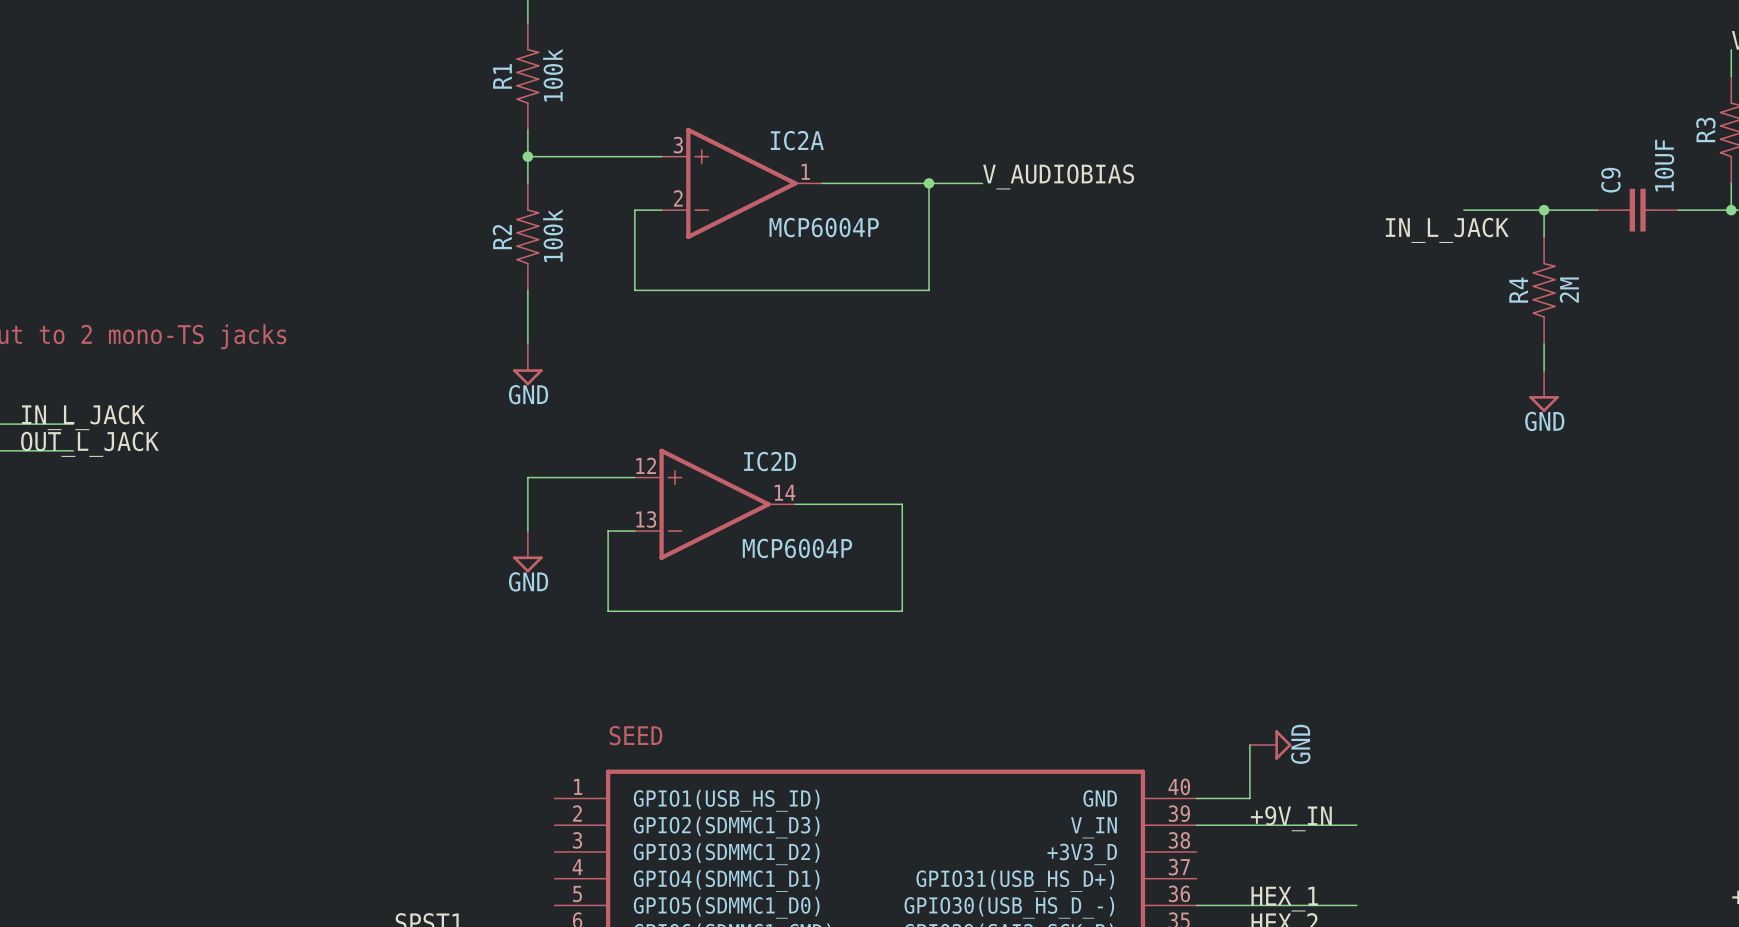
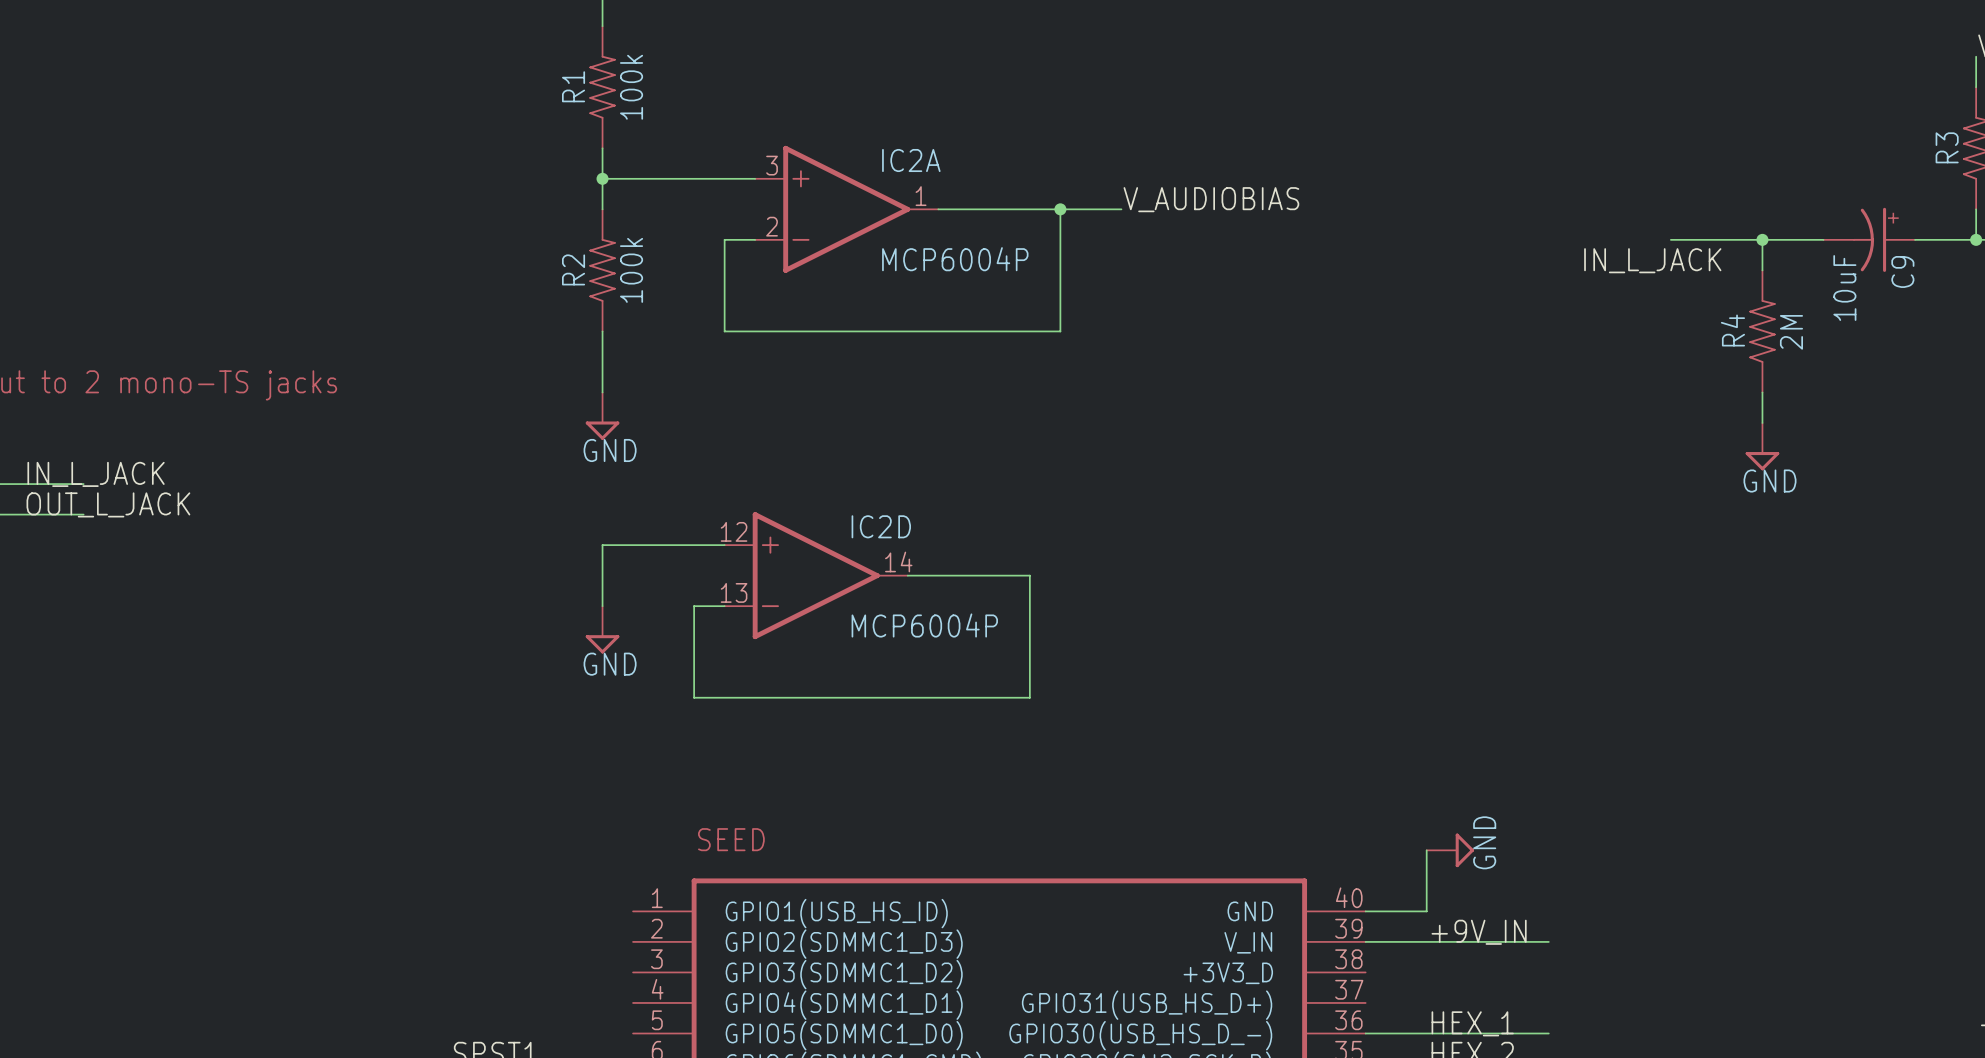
C9 value: 10UF (1664, 165) -> 10uF (1844, 288)
C9 name position: C9 (1610, 180) -> C9 (1902, 271)
C9 symbol: [1597, 188, 1678, 232] -> [1823, 207, 1916, 272]

